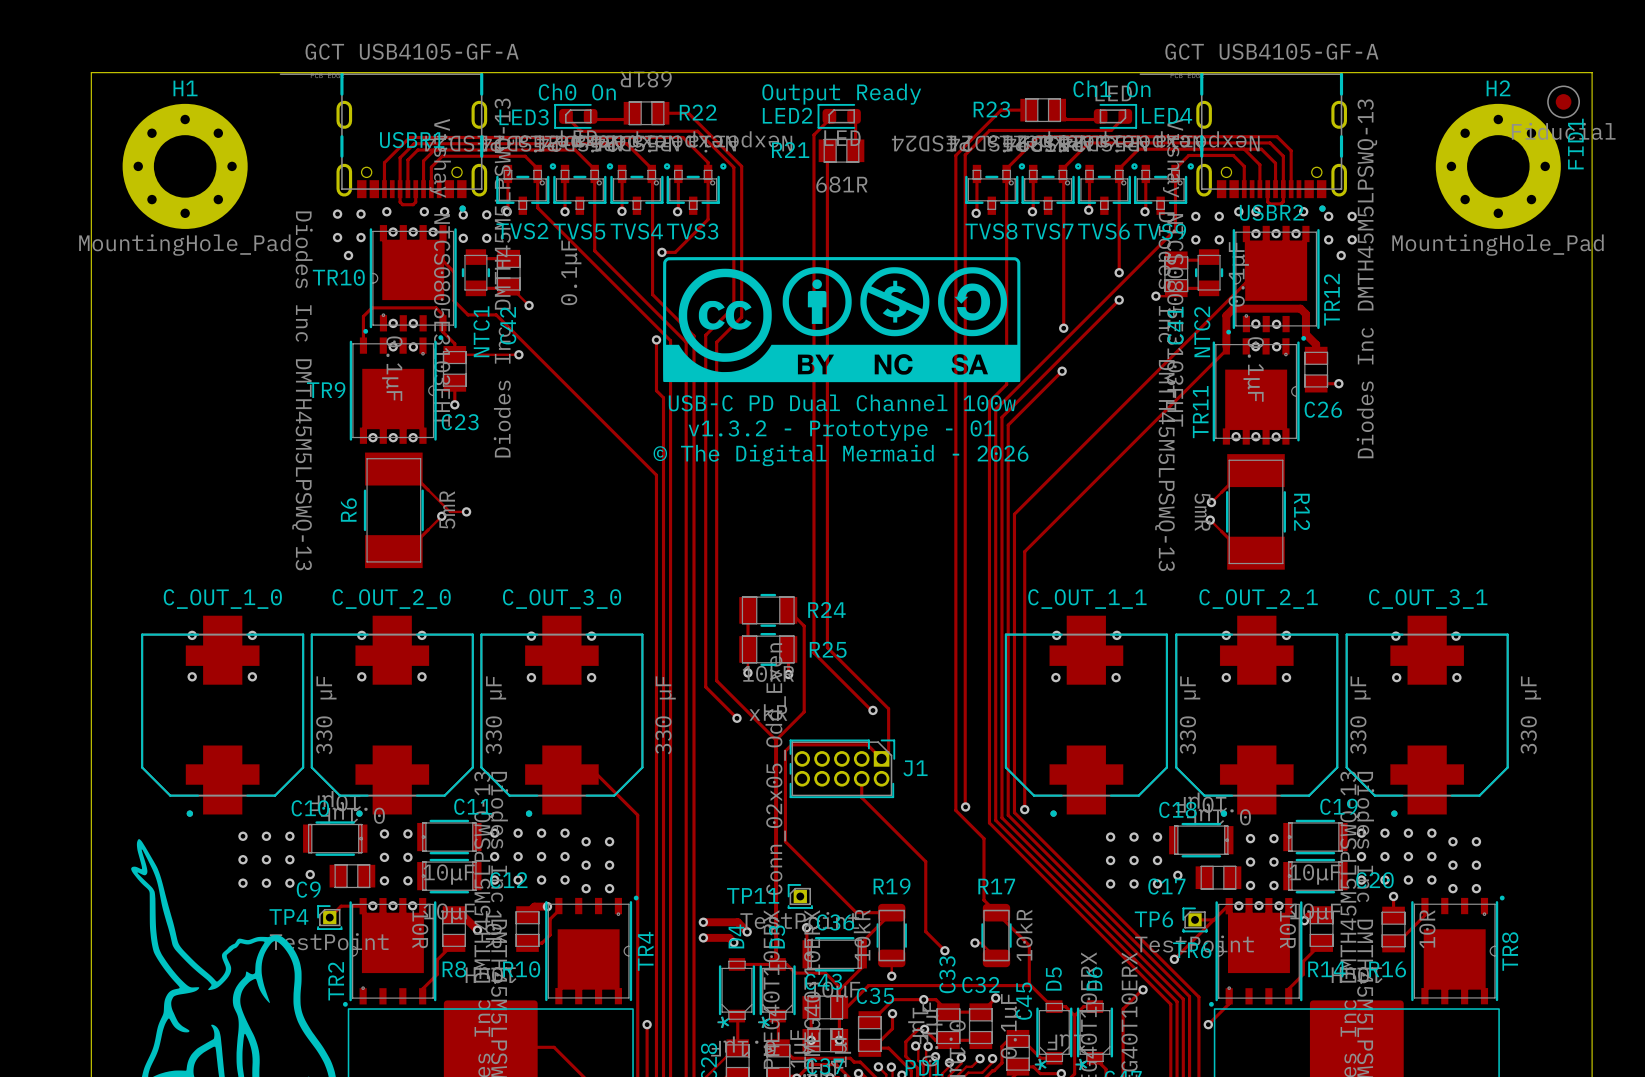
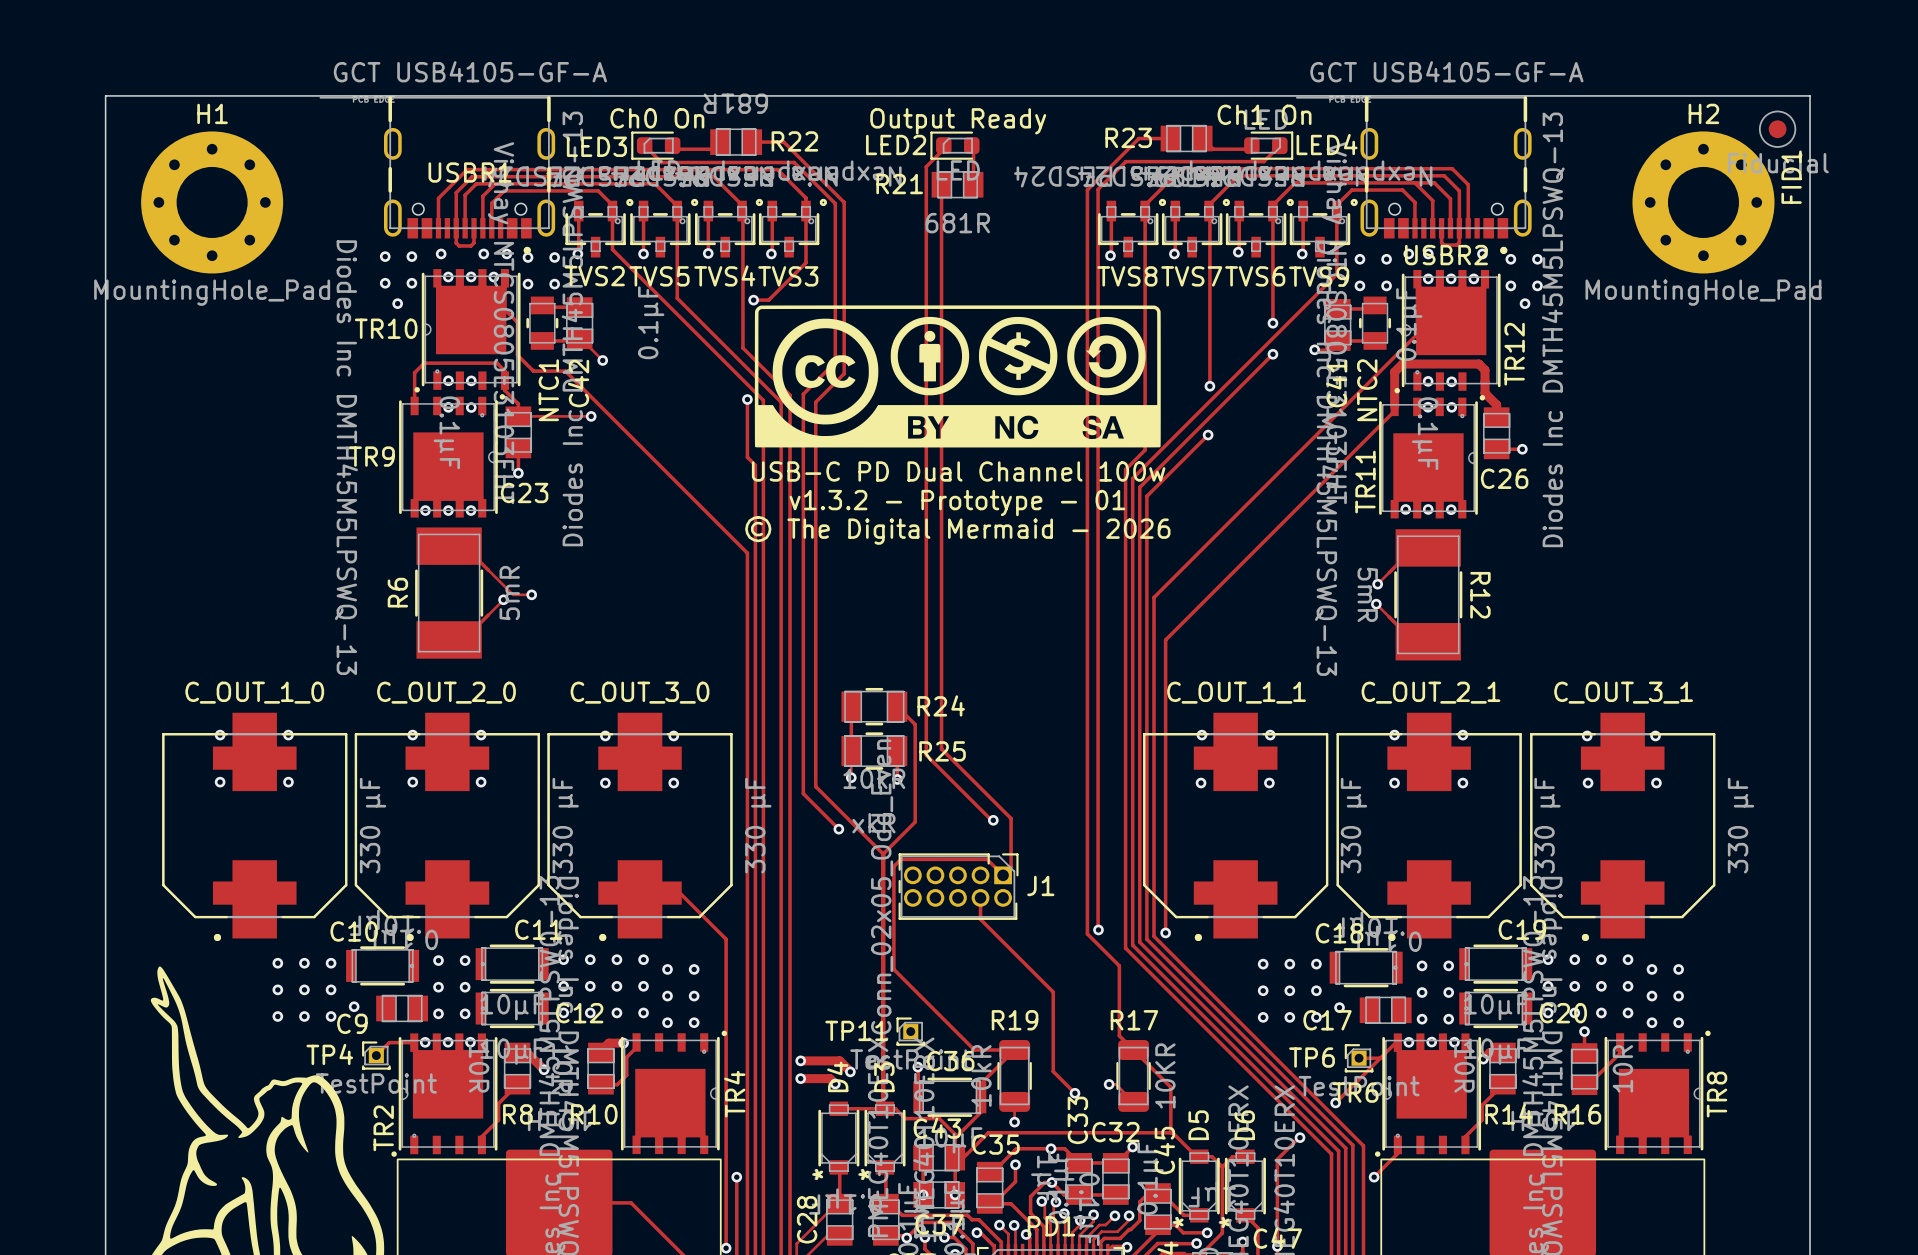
R17 value: 10kR (1024, 935) -> 10KR (1165, 1075)

